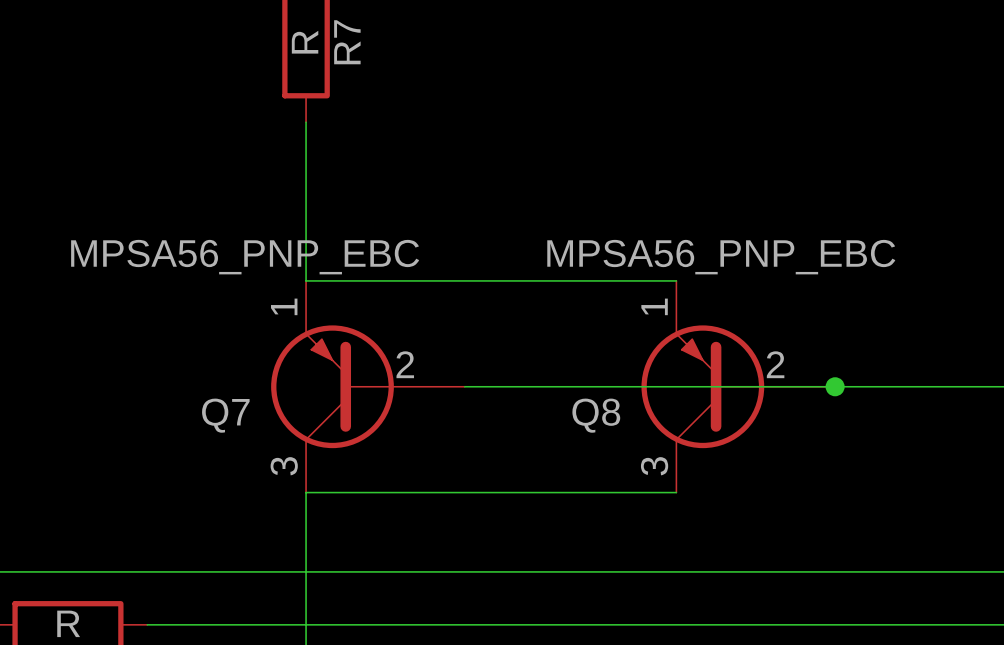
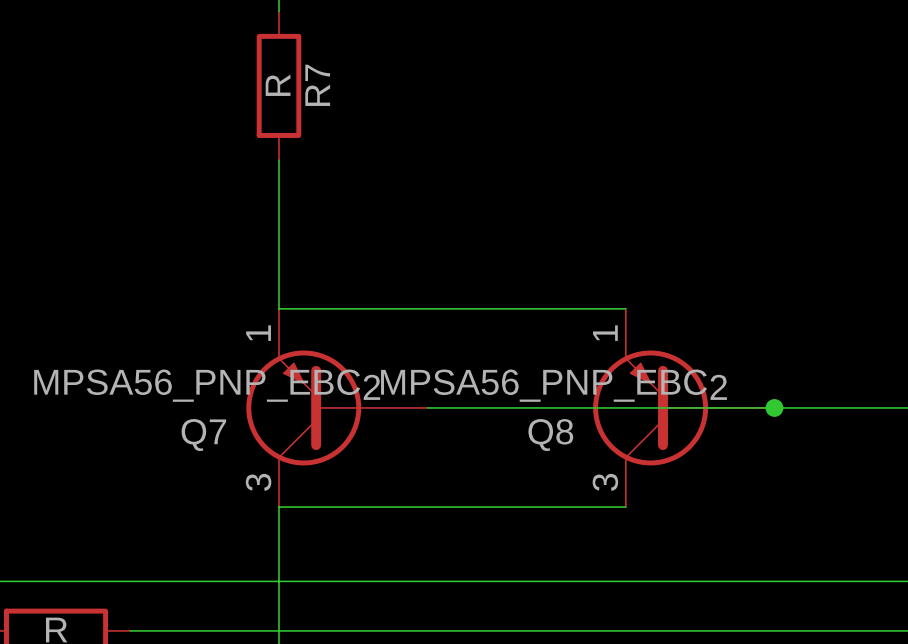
Q7 value position: MPSA56_PNP_EBC (245, 257) -> MPSA56_PNP_EBC (197, 385)
Q8 value position: MPSA56_PNP_EBC (721, 257) -> MPSA56_PNP_EBC (544, 385)

